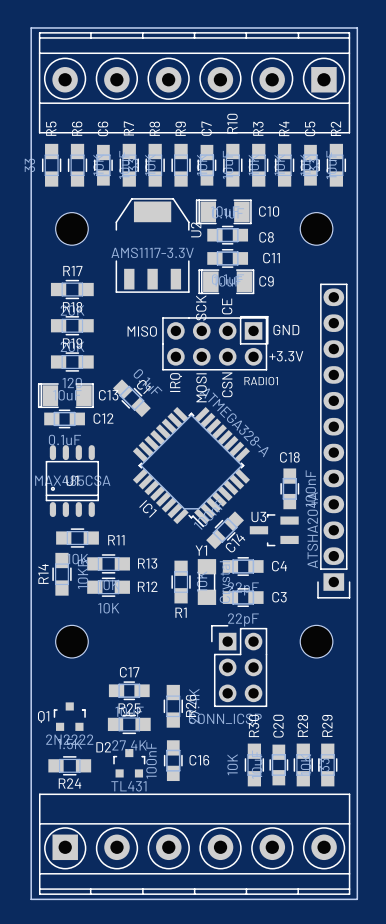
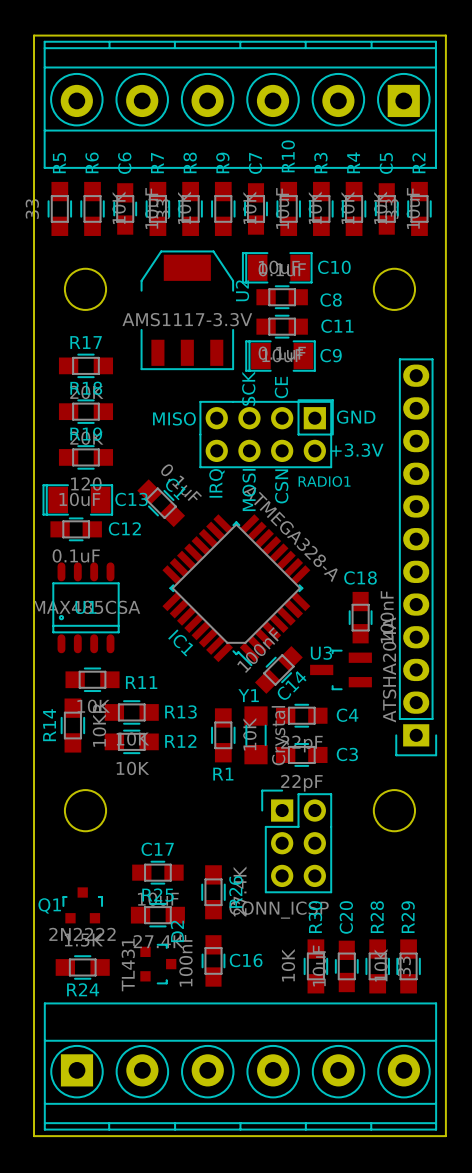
D2 rotation: 0° (129, 763) -> 90° clockwise (158, 964)

